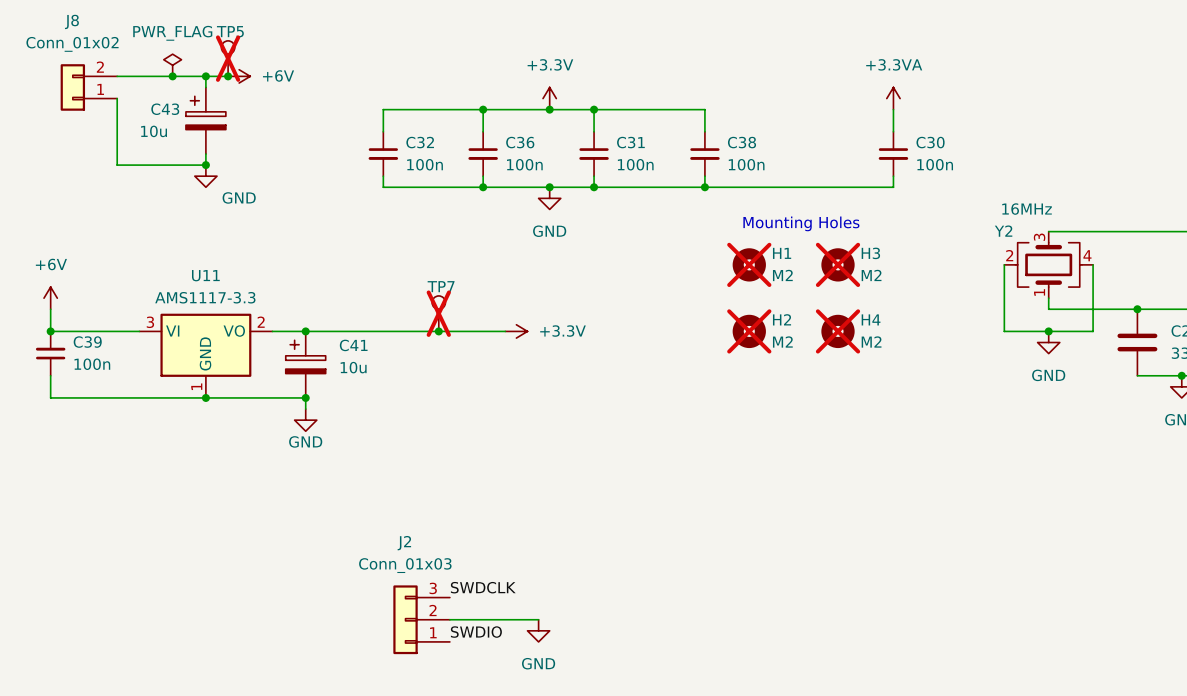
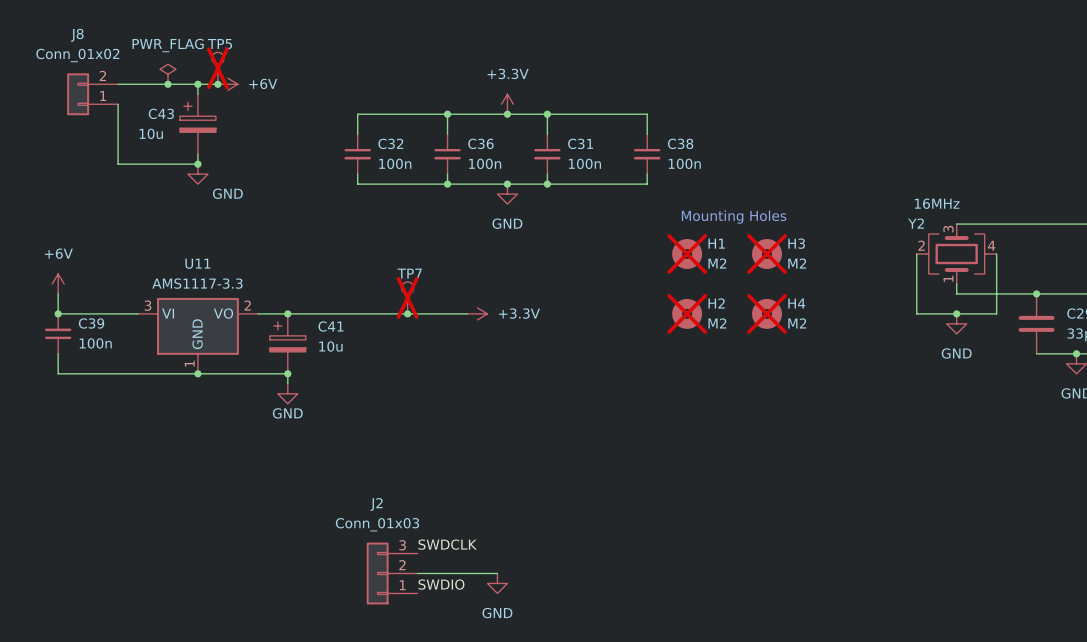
power symbol: +3.3VA (893, 98) -> none
wire: (893, 109) (893, 131) -> none
C30: 100n (893, 154) -> none
wire: (893, 176) (893, 187) (704, 187) -> none
junction: (704, 187) -> none

